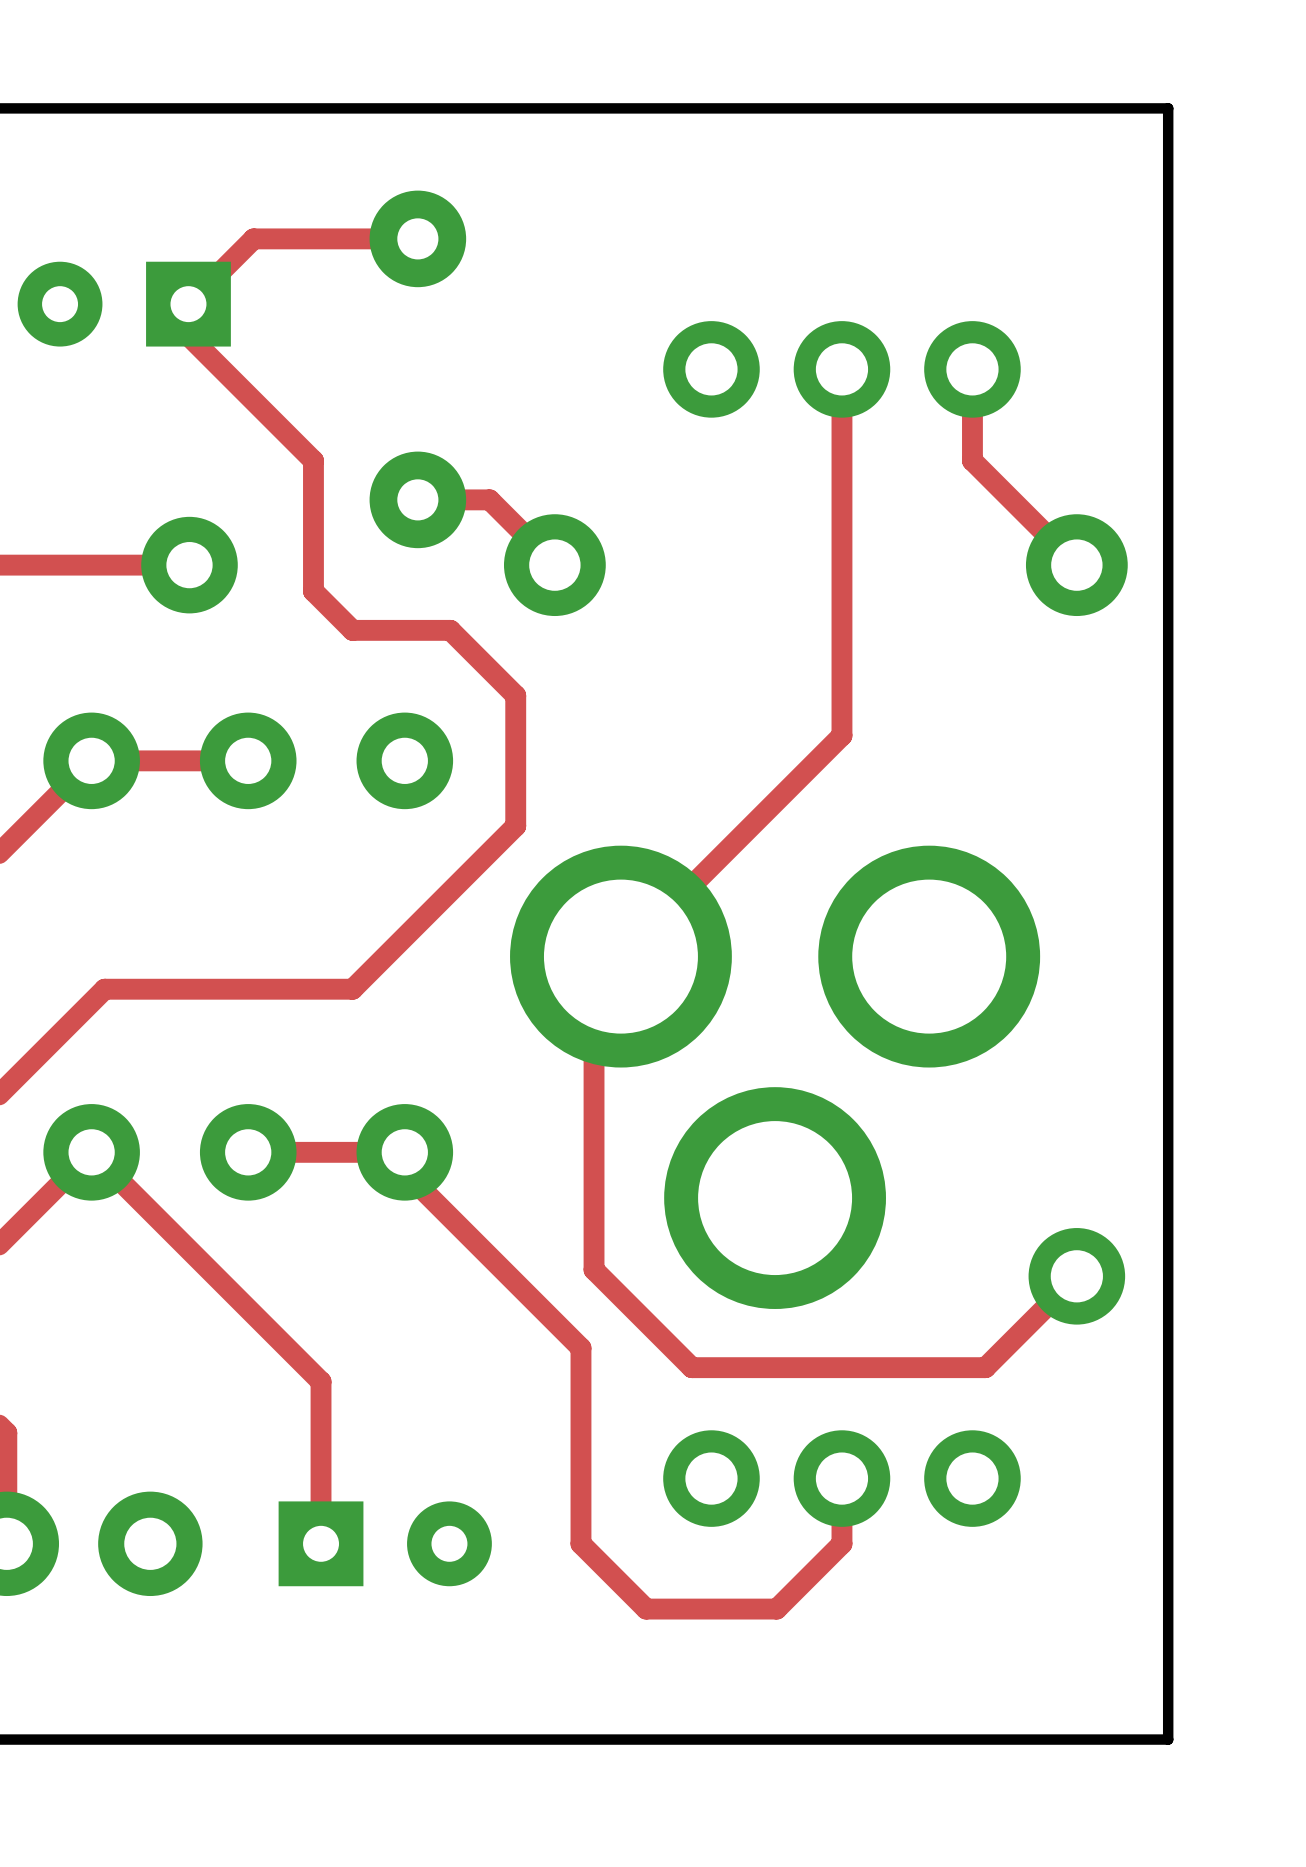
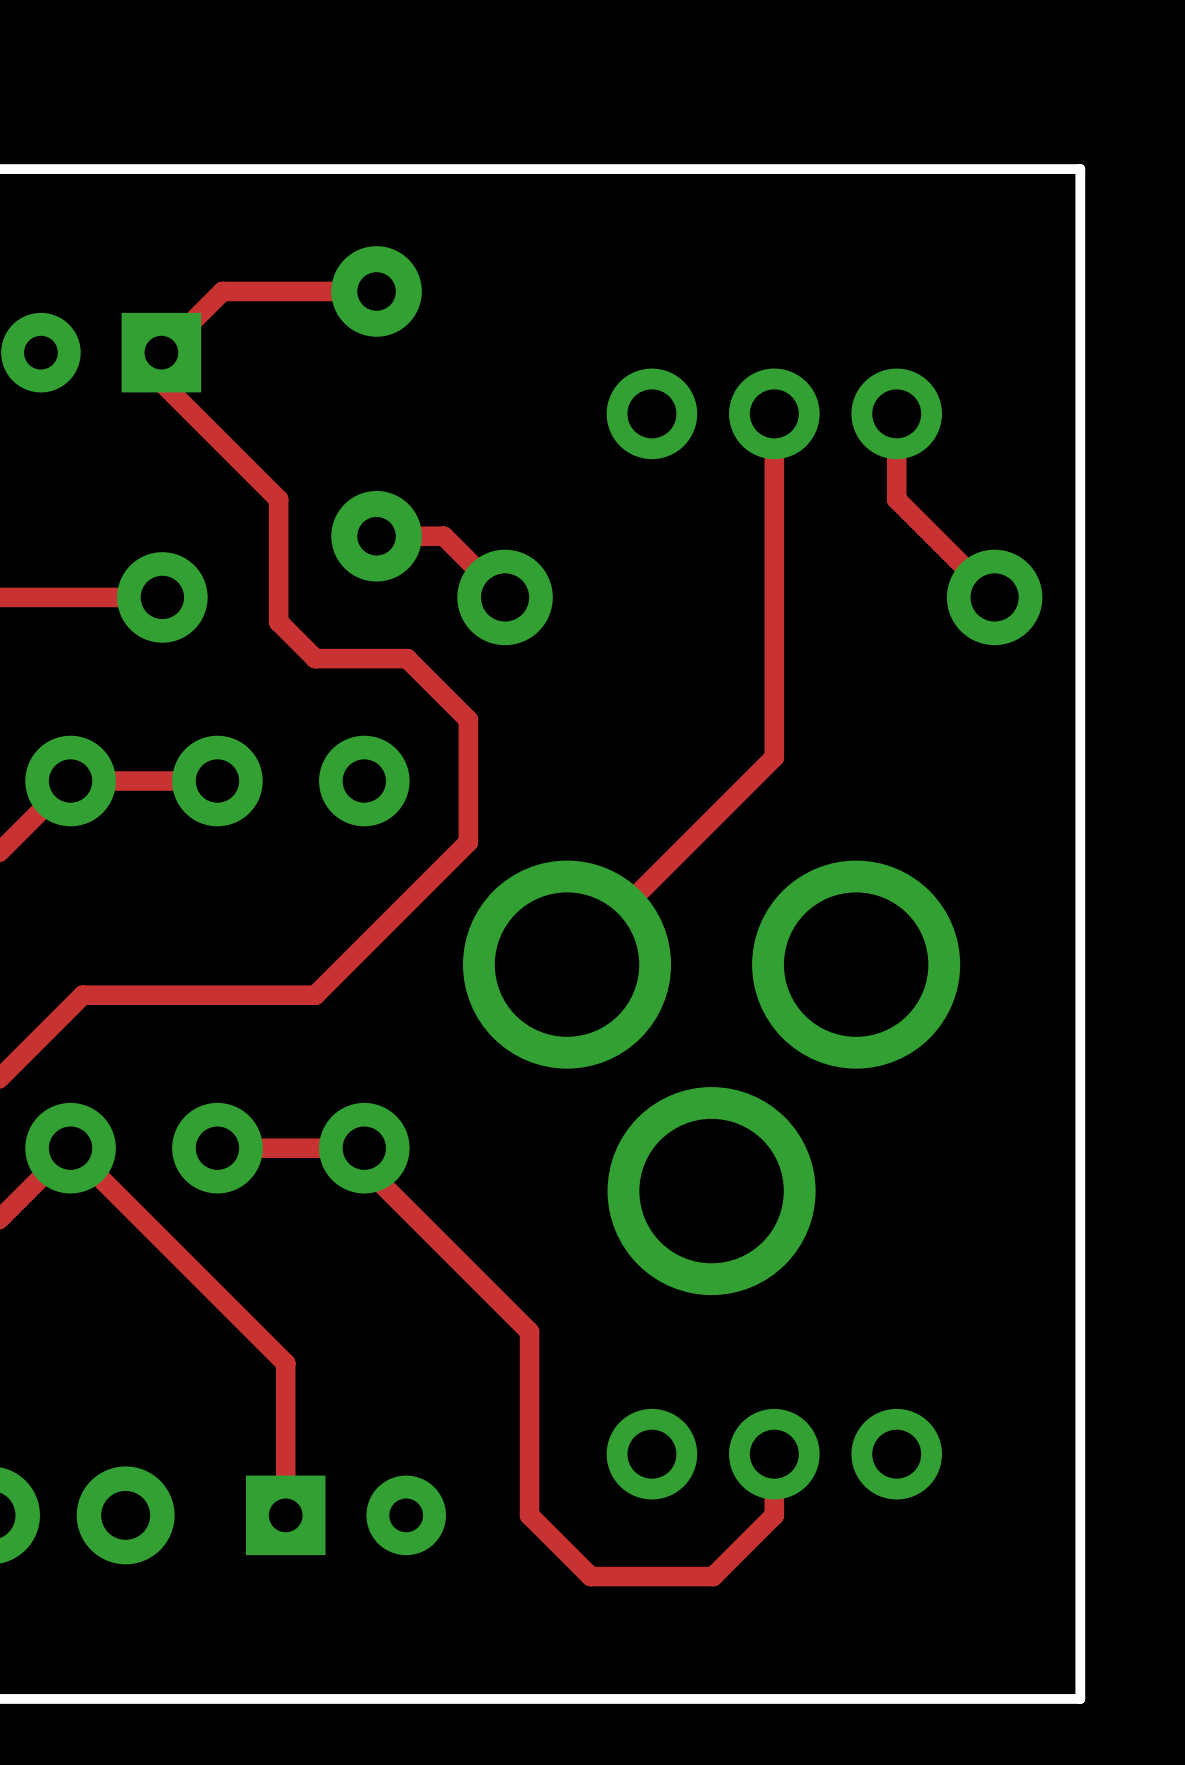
top track: (594, 983) (594, 1269) (691, 1367) (985, 1367) (1076, 1276) -> none
part: (1076, 1276) -> none

